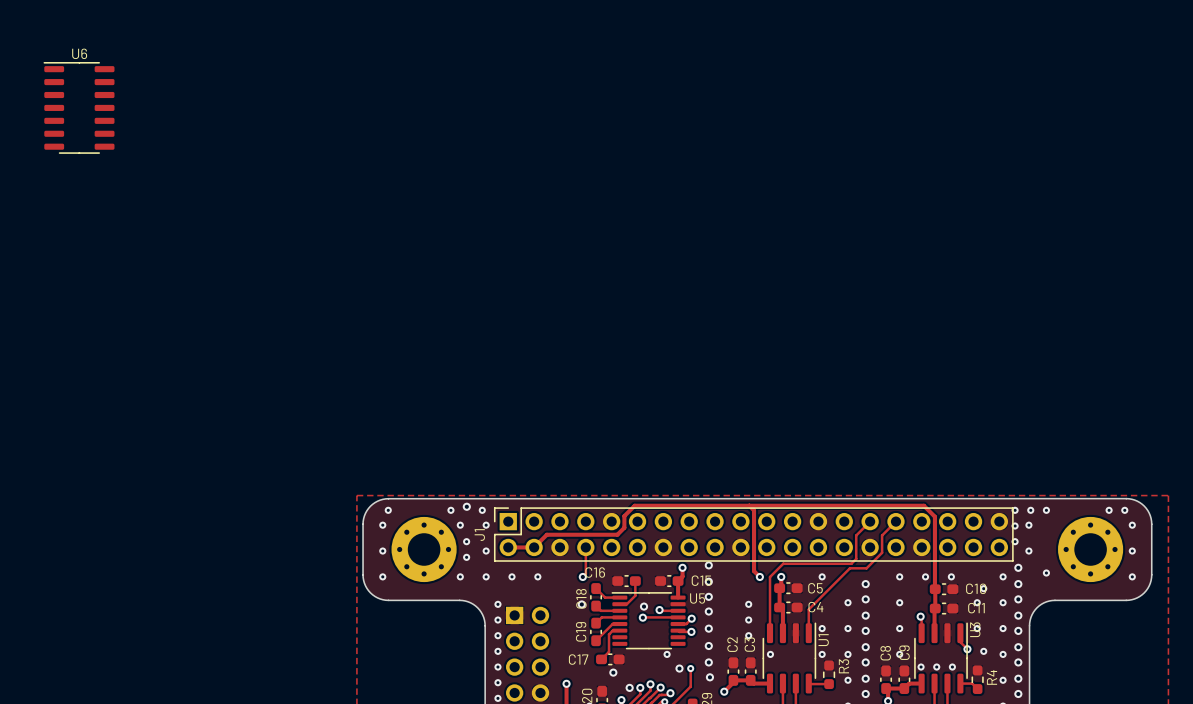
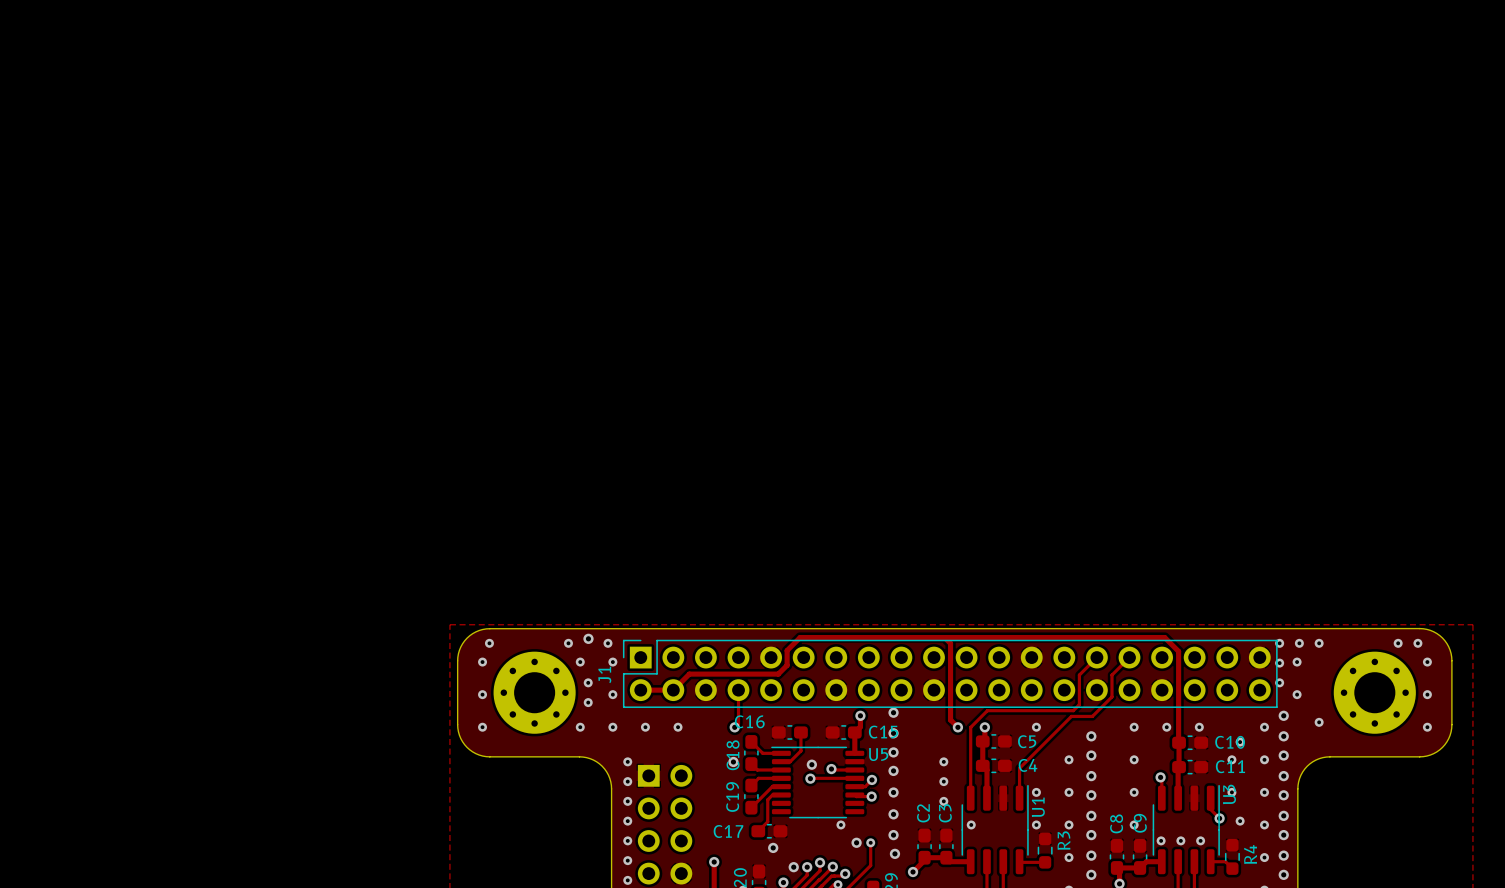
U6: (79, 107) -> none

